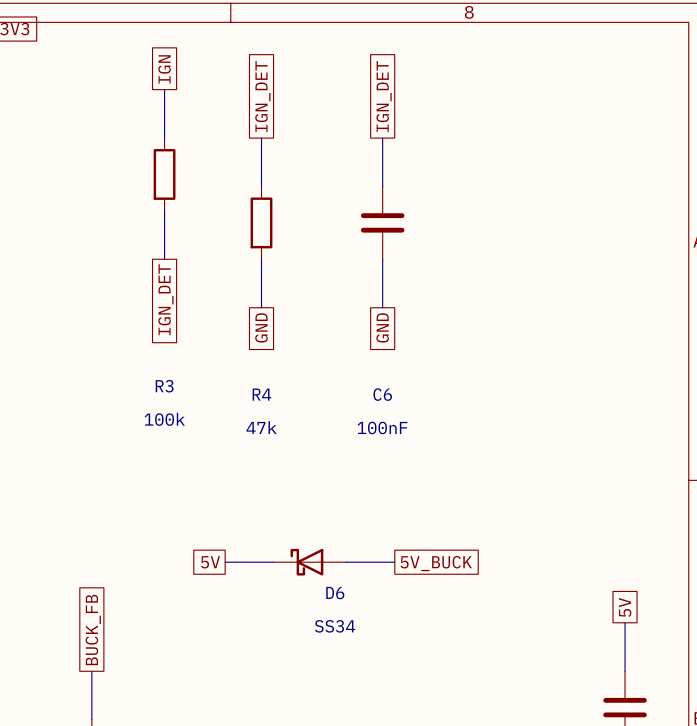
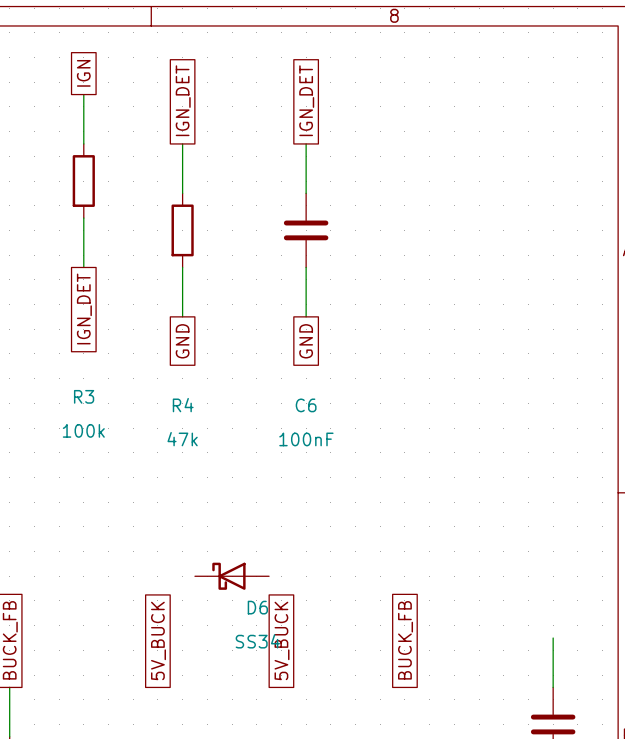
global label: 5V (210, 562) -> none
wire: (225, 562) (273, 562) -> none
wire: (346, 562) (394, 562) -> none
global label: 5V_BUCK (436, 563) -> none
global label: 5V (625, 607) -> none
global label: none -> 5V_BUCK (158, 640)
global label: none -> 5V_BUCK (282, 640)
global label: none -> BUCK_FB (405, 640)

